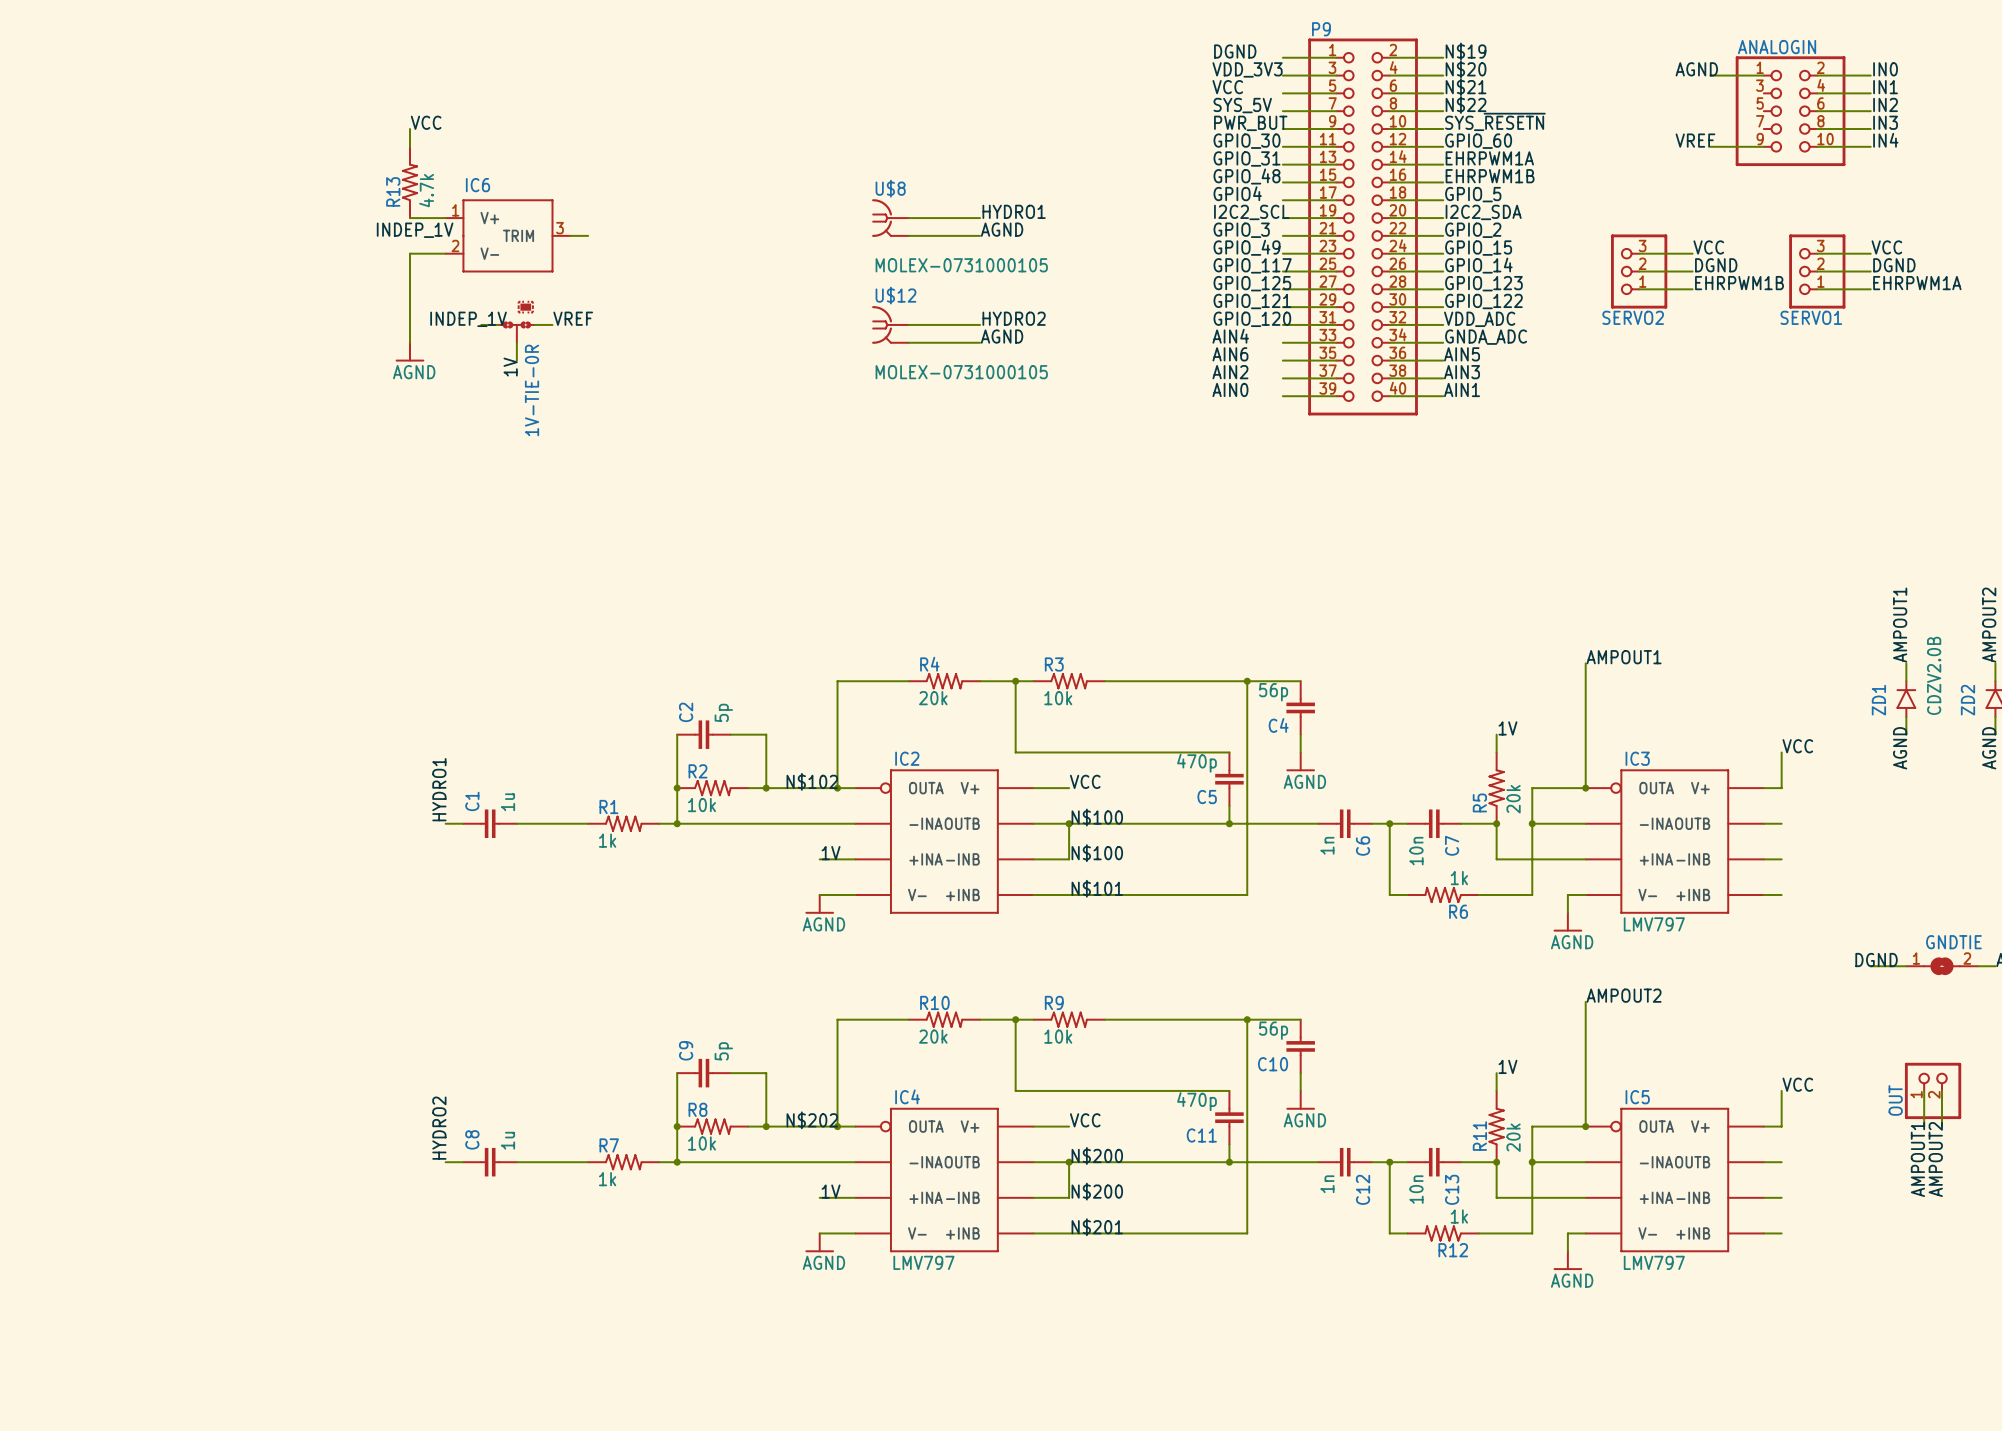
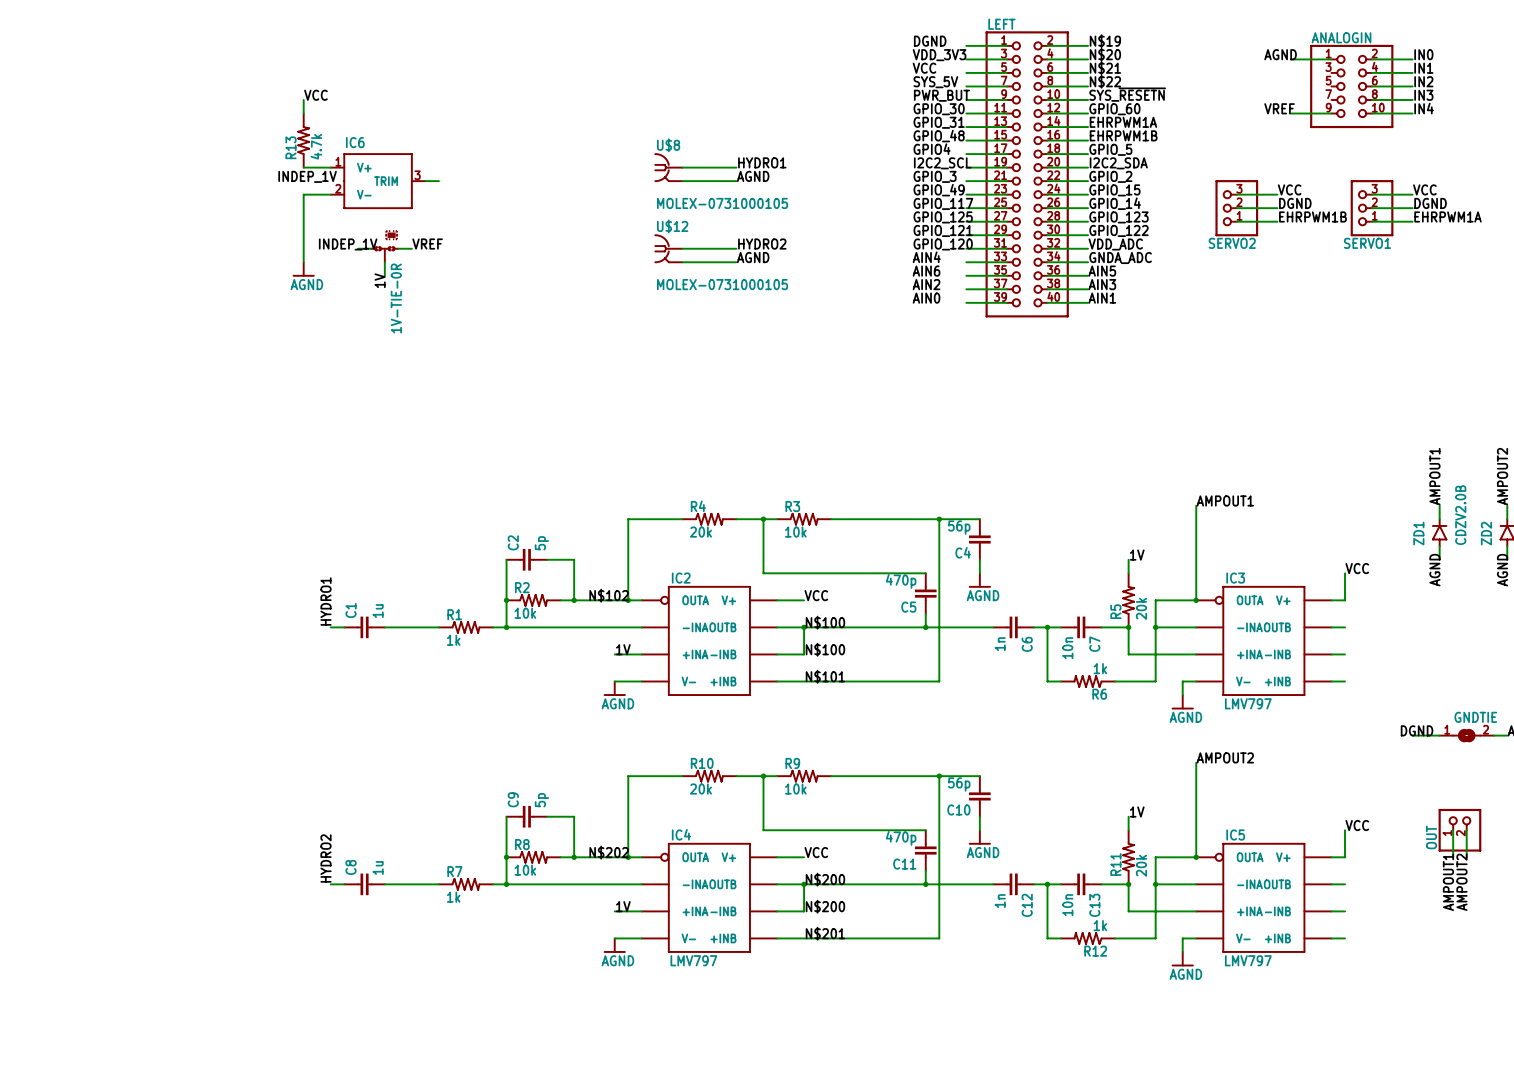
P9 name: P9 (1321, 29) -> LEFT (1001, 24)

